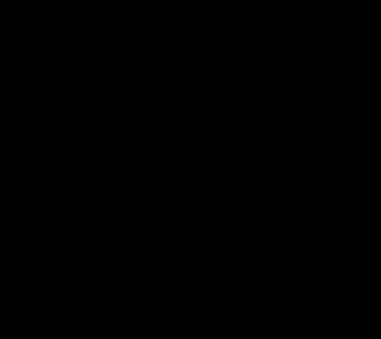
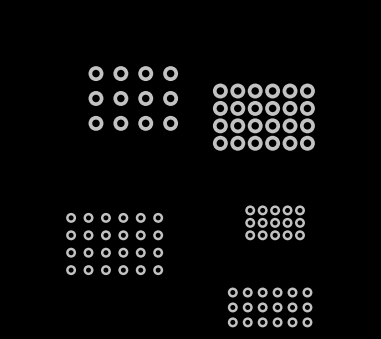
via: none -> (95, 73)
via: none -> (120, 73)
via: none -> (145, 73)
via: none -> (170, 73)
via: none -> (220, 91)
via: none -> (237, 91)
via: none -> (255, 91)
via: none -> (272, 91)
via: none -> (290, 91)
via: none -> (307, 91)
via: none -> (95, 98)
via: none -> (120, 98)
via: none -> (145, 98)
via: none -> (170, 98)
via: none -> (220, 108)
via: none -> (237, 108)
via: none -> (255, 108)
via: none -> (272, 108)
via: none -> (290, 108)
via: none -> (307, 108)
via: none -> (95, 123)
via: none -> (120, 123)
via: none -> (145, 123)
via: none -> (170, 123)
via: none -> (220, 125)
via: none -> (237, 125)
via: none -> (255, 125)
via: none -> (272, 125)
via: none -> (290, 125)
via: none -> (307, 125)
via: none -> (220, 143)
via: none -> (237, 143)
via: none -> (255, 143)
via: none -> (272, 143)
via: none -> (290, 143)
via: none -> (307, 143)
via: none -> (250, 210)
via: none -> (262, 210)
via: none -> (275, 210)
via: none -> (287, 210)
via: none -> (299, 210)
via: none -> (71, 217)
via: none -> (88, 217)
via: none -> (105, 217)
via: none -> (123, 217)
via: none -> (140, 217)
via: none -> (158, 217)
via: none -> (250, 222)
via: none -> (262, 222)
via: none -> (275, 222)
via: none -> (287, 222)
via: none -> (299, 222)
via: none -> (71, 235)
via: none -> (88, 235)
via: none -> (105, 235)
via: none -> (123, 235)
via: none -> (140, 235)
via: none -> (158, 235)
via: none -> (250, 235)
via: none -> (262, 235)
via: none -> (275, 235)
via: none -> (287, 235)
via: none -> (299, 235)
via: none -> (71, 252)
via: none -> (88, 252)
via: none -> (105, 252)
via: none -> (123, 252)
via: none -> (140, 252)
via: none -> (158, 252)
via: none -> (71, 270)
via: none -> (88, 270)
via: none -> (105, 270)
via: none -> (123, 270)
via: none -> (140, 270)
via: none -> (158, 270)
via: none -> (232, 292)
via: none -> (247, 292)
via: none -> (262, 292)
via: none -> (277, 292)
via: none -> (292, 292)
via: none -> (307, 292)
via: none -> (232, 307)
via: none -> (247, 307)
via: none -> (262, 307)
via: none -> (277, 307)
via: none -> (292, 307)
via: none -> (307, 307)
via: none -> (232, 322)
via: none -> (247, 322)
via: none -> (262, 322)
via: none -> (277, 322)
via: none -> (292, 322)
via: none -> (307, 322)

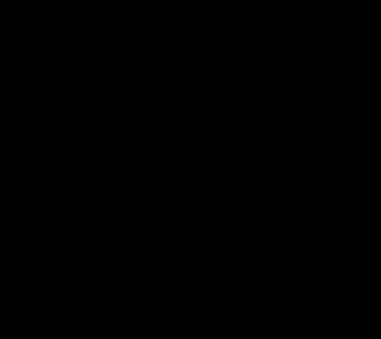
via: (95, 73) -> none
via: (120, 73) -> none
via: (145, 73) -> none
via: (170, 73) -> none
via: (220, 91) -> none
via: (237, 91) -> none
via: (255, 91) -> none
via: (272, 91) -> none
via: (290, 91) -> none
via: (307, 91) -> none
via: (95, 98) -> none
via: (120, 98) -> none
via: (145, 98) -> none
via: (170, 98) -> none
via: (220, 108) -> none
via: (237, 108) -> none
via: (255, 108) -> none
via: (272, 108) -> none
via: (290, 108) -> none
via: (307, 108) -> none
via: (95, 123) -> none
via: (120, 123) -> none
via: (145, 123) -> none
via: (170, 123) -> none
via: (220, 125) -> none
via: (237, 125) -> none
via: (255, 125) -> none
via: (272, 125) -> none
via: (290, 125) -> none
via: (307, 125) -> none
via: (220, 143) -> none
via: (237, 143) -> none
via: (255, 143) -> none
via: (272, 143) -> none
via: (290, 143) -> none
via: (307, 143) -> none
via: (250, 210) -> none
via: (262, 210) -> none
via: (275, 210) -> none
via: (287, 210) -> none
via: (299, 210) -> none
via: (71, 217) -> none
via: (88, 217) -> none
via: (105, 217) -> none
via: (123, 217) -> none
via: (140, 217) -> none
via: (158, 217) -> none
via: (250, 222) -> none
via: (262, 222) -> none
via: (275, 222) -> none
via: (287, 222) -> none
via: (299, 222) -> none
via: (71, 235) -> none
via: (88, 235) -> none
via: (105, 235) -> none
via: (123, 235) -> none
via: (140, 235) -> none
via: (158, 235) -> none
via: (250, 235) -> none
via: (262, 235) -> none
via: (275, 235) -> none
via: (287, 235) -> none
via: (299, 235) -> none
via: (71, 252) -> none
via: (88, 252) -> none
via: (105, 252) -> none
via: (123, 252) -> none
via: (140, 252) -> none
via: (158, 252) -> none
via: (71, 270) -> none
via: (88, 270) -> none
via: (105, 270) -> none
via: (123, 270) -> none
via: (140, 270) -> none
via: (158, 270) -> none
via: (232, 292) -> none
via: (247, 292) -> none
via: (262, 292) -> none
via: (277, 292) -> none
via: (292, 292) -> none
via: (307, 292) -> none
via: (232, 307) -> none
via: (247, 307) -> none
via: (262, 307) -> none
via: (277, 307) -> none
via: (292, 307) -> none
via: (307, 307) -> none
via: (232, 322) -> none
via: (247, 322) -> none
via: (262, 322) -> none
via: (277, 322) -> none
via: (292, 322) -> none
via: (307, 322) -> none

